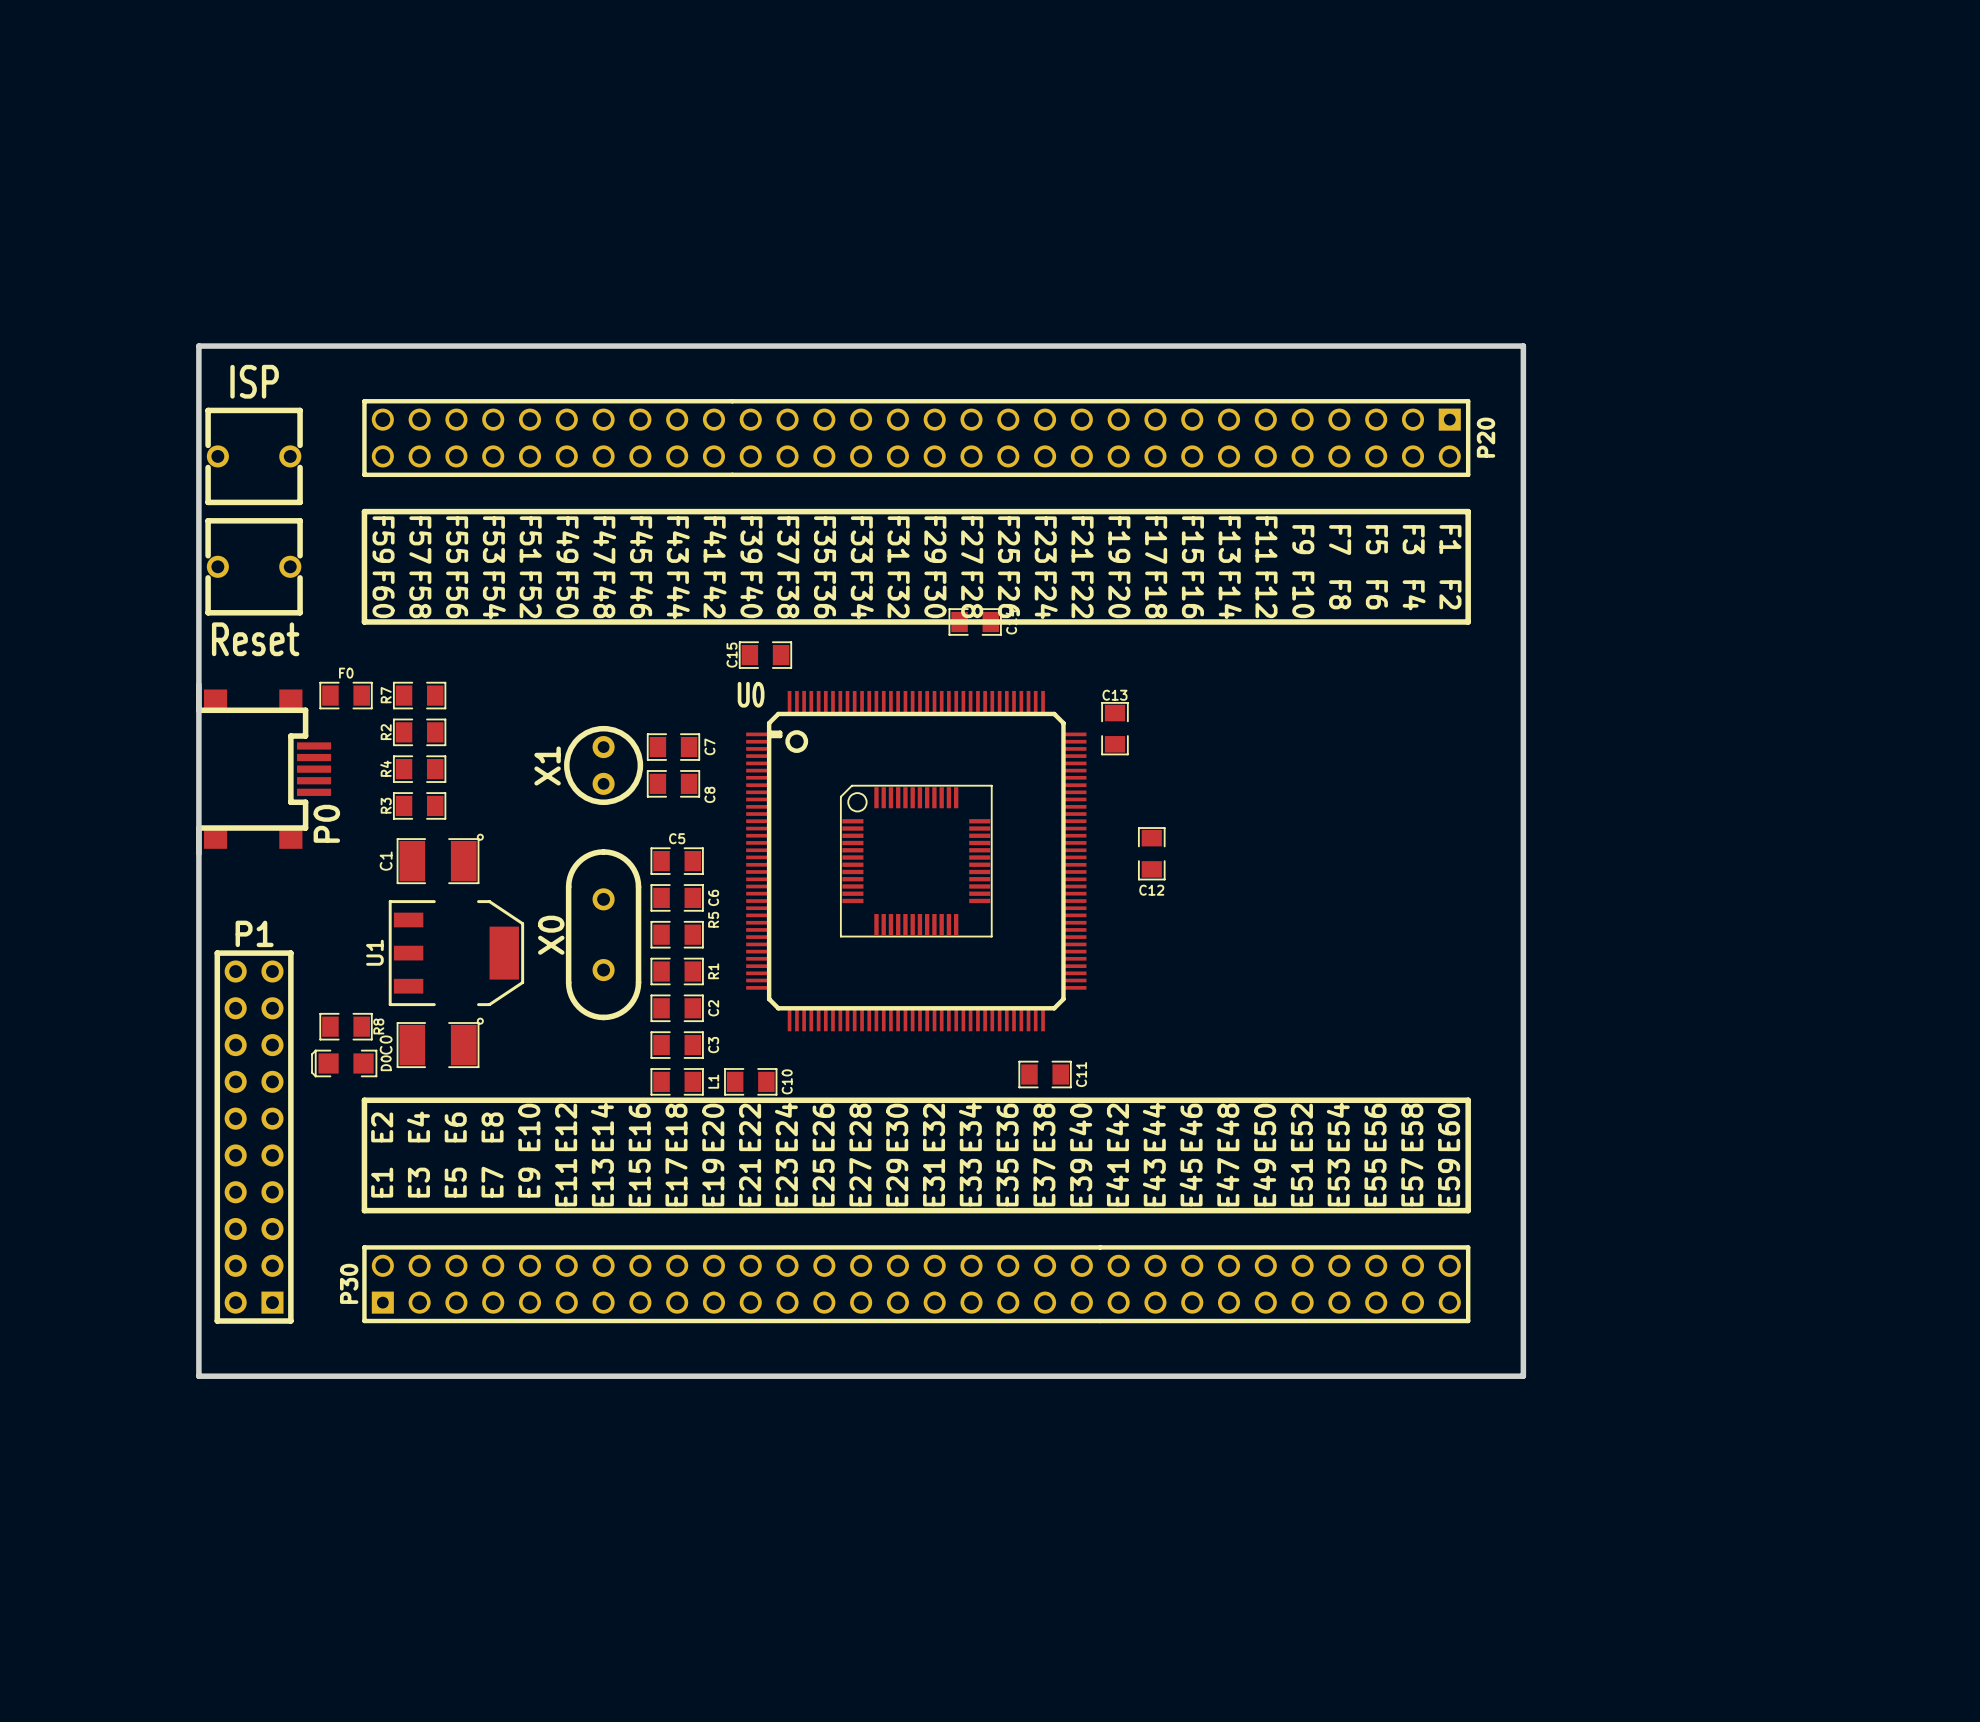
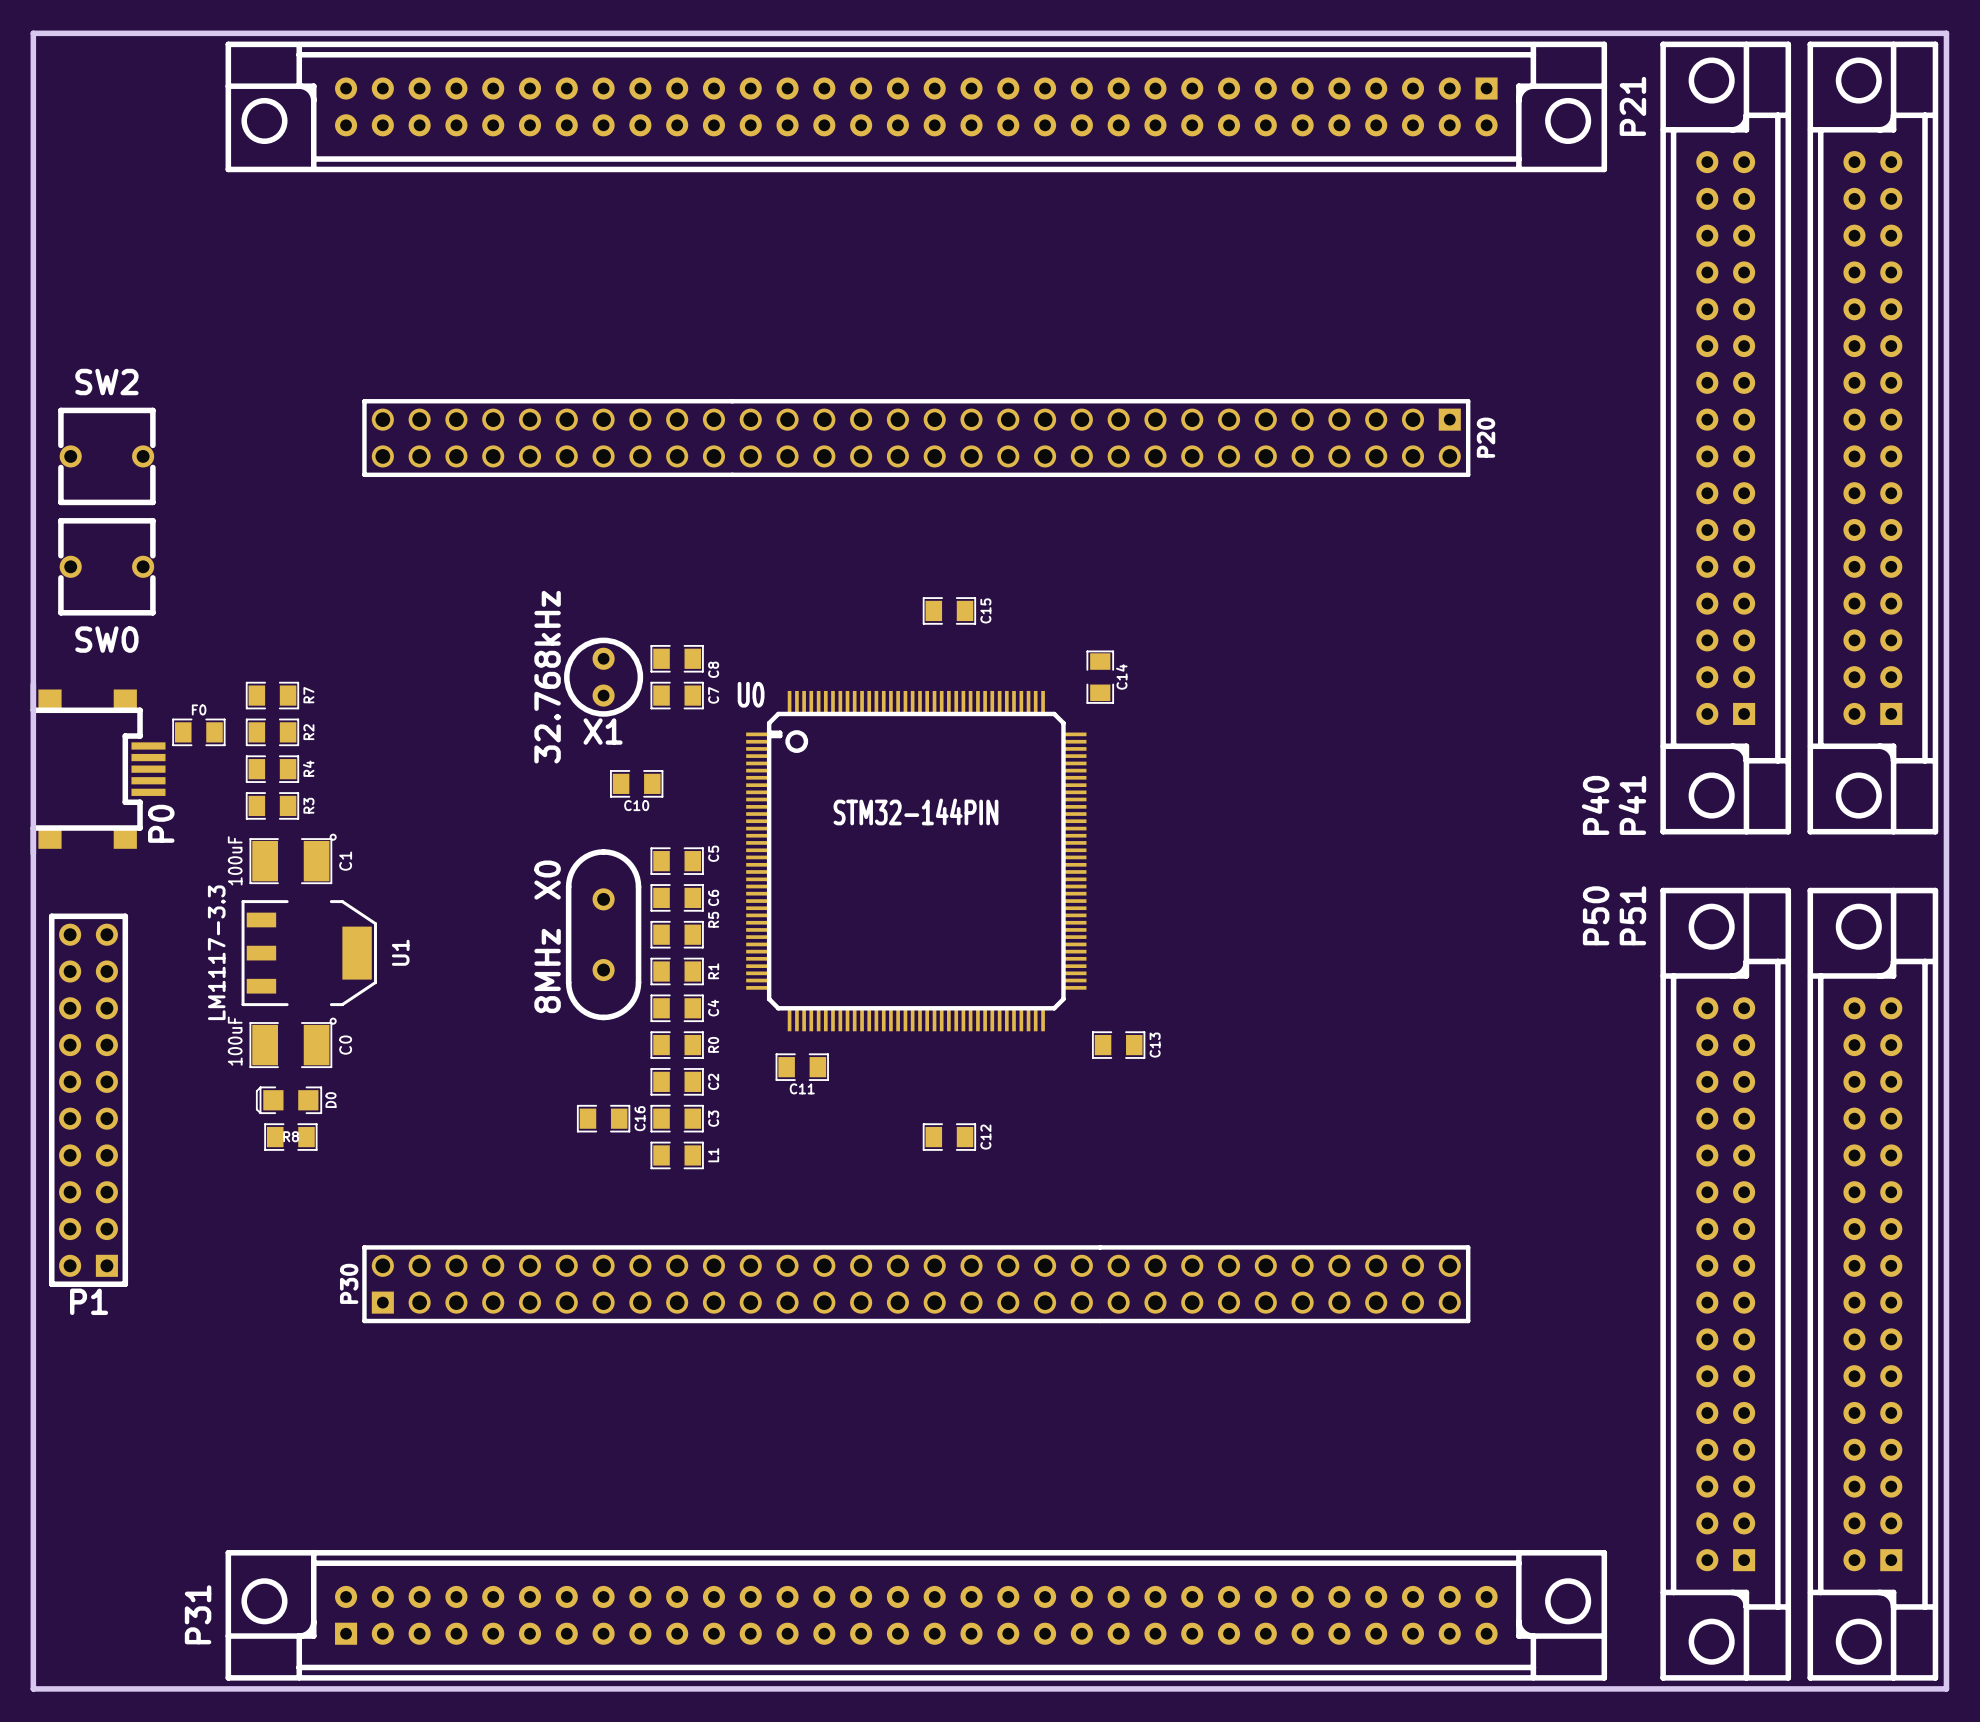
board edge: none -> (33, 33) (1946, 33) (1946, 1688) (33, 1688) (33, 33)
P21: none -> (916, 106)
board edge: (198, 346) (1523, 346) (1523, 1376) (198, 1376) (198, 346) -> none
text: ISP (254, 381) -> none
P40: none -> (1725, 438)
P41: none -> (1872, 438)
SW2: none -> (106, 456)
part: (254, 456) -> none
line: (364, 511) (364, 621) (1468, 621) (1468, 511) (364, 511) -> none
text: F59 (383, 539) -> none
text: F55 (457, 539) -> none
text: F53 (493, 539) -> none
text: F51 (530, 539) -> none
text: F49 (567, 539) -> none
text: F45 (641, 539) -> none
text: F43 (678, 539) -> none
text: F41 (715, 539) -> none
text: F39 (751, 539) -> none
text: F35 (825, 539) -> none
text: F33 (861, 539) -> none
text: F31 (898, 539) -> none
text: F29 (935, 539) -> none
text: F25 (1008, 539) -> none
text: F23 (1045, 539) -> none
text: F21 (1082, 539) -> none
text: F19 (1119, 539) -> none
text: F15 (1192, 539) -> none
text: F13 (1229, 539) -> none
text: F11 (1266, 539) -> none
text: F9 (1303, 539) -> none
text: F5 (1376, 539) -> none
text: F3 (1413, 539) -> none
text: F1 (1450, 539) -> none
text: F57 (420, 540) -> none
text: F47 (604, 540) -> none
text: F37 (788, 540) -> none
text: F27 (972, 540) -> none
text: F17 (1156, 540) -> none
text: F7 (1340, 540) -> none
SW0: none -> (106, 566)
part: (254, 566) -> none
text: F60 (383, 594) -> none
text: F58 (420, 594) -> none
text: F56 (457, 594) -> none
text: F52 (530, 594) -> none
text: F50 (567, 594) -> none
text: F48 (604, 594) -> none
text: F46 (641, 594) -> none
text: F42 (715, 594) -> none
text: F40 (751, 594) -> none
text: F38 (788, 594) -> none
text: F36 (825, 594) -> none
text: F32 (898, 594) -> none
text: F30 (935, 594) -> none
text: F28 (972, 594) -> none
text: F26 (1008, 594) -> none
text: F22 (1082, 594) -> none
text: F20 (1119, 594) -> none
text: F18 (1156, 594) -> none
text: F16 (1192, 594) -> none
text: F12 (1266, 594) -> none
text: F10 (1303, 594) -> none
text: F8 (1340, 594) -> none
text: F6 (1376, 594) -> none
text: F2 (1450, 594) -> none
text: F54 (494, 595) -> none
text: F44 (678, 595) -> none
text: F34 (862, 595) -> none
text: F24 (1046, 595) -> none
text: F14 (1230, 595) -> none
text: F4 (1414, 595) -> none
C14 rotation: 0° (975, 621) -> 90° clockwise (1100, 677)
C14 position: (975, 621) -> (1100, 677)
text: Reset (255, 639) -> none
C15 name position: C15 (732, 655) -> C15 (985, 610)
C15 position: (765, 655) -> (949, 610)
X1 value: none -> 32.768kHz (547, 677)
F0 position: (346, 695) -> (198, 732)
R7 name position: R7 (386, 695) -> R7 (308, 695)
R7 position: (419, 695) -> (272, 695)
C13 rotation: 0° (1114, 728) -> 90° clockwise (1118, 1045)
C13 position: (1114, 728) -> (1118, 1045)
R2 name position: R2 (386, 732) -> R2 (308, 732)
R2 position: (419, 732) -> (272, 732)
C7 position: (673, 747) -> (677, 695)
X1 name rotation: 0° (547, 765) -> 90° clockwise (603, 731)
X1 name position: X1 (547, 765) -> X1 (603, 731)
X1 position: (603, 765) -> (603, 677)
R4 name position: R4 (385, 768) -> R4 (308, 768)
P0 position: (263, 769) -> (98, 769)
R4 position: (419, 769) -> (272, 769)
C8 position: (673, 783) -> (677, 658)
R3 name position: R3 (386, 805) -> R3 (308, 805)
R3 position: (419, 805) -> (272, 805)
U0 value: none -> STM32-144PIN (915, 811)
C5 name rotation: 0° (677, 838) -> 90° counterclockwise (713, 853)
C5 name position: C5 (677, 838) -> C5 (713, 853)
C12 rotation: 0° (1151, 853) -> 90° clockwise (949, 1137)
C12 position: (1151, 853) -> (949, 1137)
C1 position: (440, 858) -> (293, 858)
C1 value: none -> 100uF (235, 860)
C1 name position: C1 (386, 861) -> C1 (345, 861)
part: (916, 861) -> none
C12 name position: C12 (1151, 890) -> C12 (985, 1137)
P1 name position: P1 (254, 933) -> P1 (89, 1301)
X0 name position: X0 (551, 935) -> X0 (547, 880)
U1 value: none -> LM1117-3.3 (216, 952)
U1 name position: U1 (374, 952) -> U1 (400, 952)
U1 position: (456, 953) -> (309, 953)
X0 value: none -> 8MHz (547, 970)
C2 name: C2 (713, 1008) -> C4 (713, 1008)
R8 position: (346, 1026) -> (290, 1137)
R8 name rotation: 0° (378, 1026) -> 90° clockwise (291, 1136)
R8 name position: R8 (378, 1026) -> R8 (291, 1136)
C0 value: none -> 100uF (235, 1041)
C0 position: (440, 1042) -> (293, 1042)
C0 name position: C0 (386, 1045) -> C0 (345, 1045)
C3 name: C3 (713, 1045) -> R0 (713, 1044)
D0 position: (344, 1063) -> (289, 1100)
C11 position: (1045, 1074) -> (802, 1067)
C11 name rotation: 0° (1081, 1074) -> 90° clockwise (802, 1088)
C11 name position: C11 (1081, 1074) -> C11 (802, 1088)
L1 name: L1 (713, 1081) -> C2 (713, 1081)
C10 position: (750, 1081) -> (636, 783)
C10 name rotation: 0° (787, 1081) -> 90° clockwise (636, 805)
C10 name position: C10 (787, 1081) -> C10 (636, 805)
line: (364, 1100) (364, 1210) (1468, 1210) (1468, 1100) (364, 1100) -> none
C16: none -> (603, 1118)
C3: none -> (677, 1118)
text: E4 (418, 1126) -> none
text: E14 (602, 1126) -> none
text: E24 (786, 1126) -> none
text: E34 (970, 1126) -> none
text: E44 (1154, 1126) -> none
text: E54 (1338, 1126) -> none
text: E2 (382, 1127) -> none
text: E6 (455, 1127) -> none
text: E8 (492, 1127) -> none
text: E10 (529, 1127) -> none
text: E12 (566, 1127) -> none
text: E16 (639, 1127) -> none
text: E18 (676, 1127) -> none
text: E20 (713, 1127) -> none
text: E22 (750, 1127) -> none
text: E26 (823, 1127) -> none
text: E28 (860, 1127) -> none
text: E30 (897, 1127) -> none
text: E32 (934, 1127) -> none
text: E36 (1007, 1127) -> none
text: E38 (1044, 1127) -> none
text: E40 (1080, 1127) -> none
text: E42 (1117, 1127) -> none
text: E46 (1191, 1127) -> none
text: E48 (1227, 1127) -> none
text: E50 (1265, 1127) -> none
text: E52 (1301, 1127) -> none
text: E56 (1375, 1127) -> none
text: E58 (1412, 1127) -> none
text: E60 (1449, 1127) -> none
P1 position: (254, 1137) -> (88, 1100)
L1: none -> (677, 1155)
text: E1 (382, 1182) -> none
text: E3 (418, 1182) -> none
text: E5 (455, 1182) -> none
text: E7 (492, 1182) -> none
text: E9 (529, 1182) -> none
text: E11 (566, 1182) -> none
text: E13 (602, 1182) -> none
text: E15 (639, 1182) -> none
text: E17 (676, 1182) -> none
text: E19 (713, 1182) -> none
text: E21 (750, 1182) -> none
text: E23 (786, 1182) -> none
text: E25 (823, 1182) -> none
text: E27 (860, 1182) -> none
text: E29 (897, 1182) -> none
text: E31 (934, 1182) -> none
text: E33 (970, 1182) -> none
text: E35 (1007, 1182) -> none
text: E37 (1044, 1182) -> none
text: E39 (1081, 1182) -> none
text: E41 (1117, 1182) -> none
text: E43 (1154, 1182) -> none
text: E45 (1191, 1182) -> none
text: E47 (1227, 1182) -> none
text: E49 (1264, 1182) -> none
text: E51 (1301, 1182) -> none
text: E53 (1338, 1182) -> none
text: E55 (1375, 1182) -> none
text: E57 (1412, 1182) -> none
text: E59 (1449, 1182) -> none
P50: none -> (1725, 1284)
P51: none -> (1872, 1284)
P31: none -> (916, 1615)

